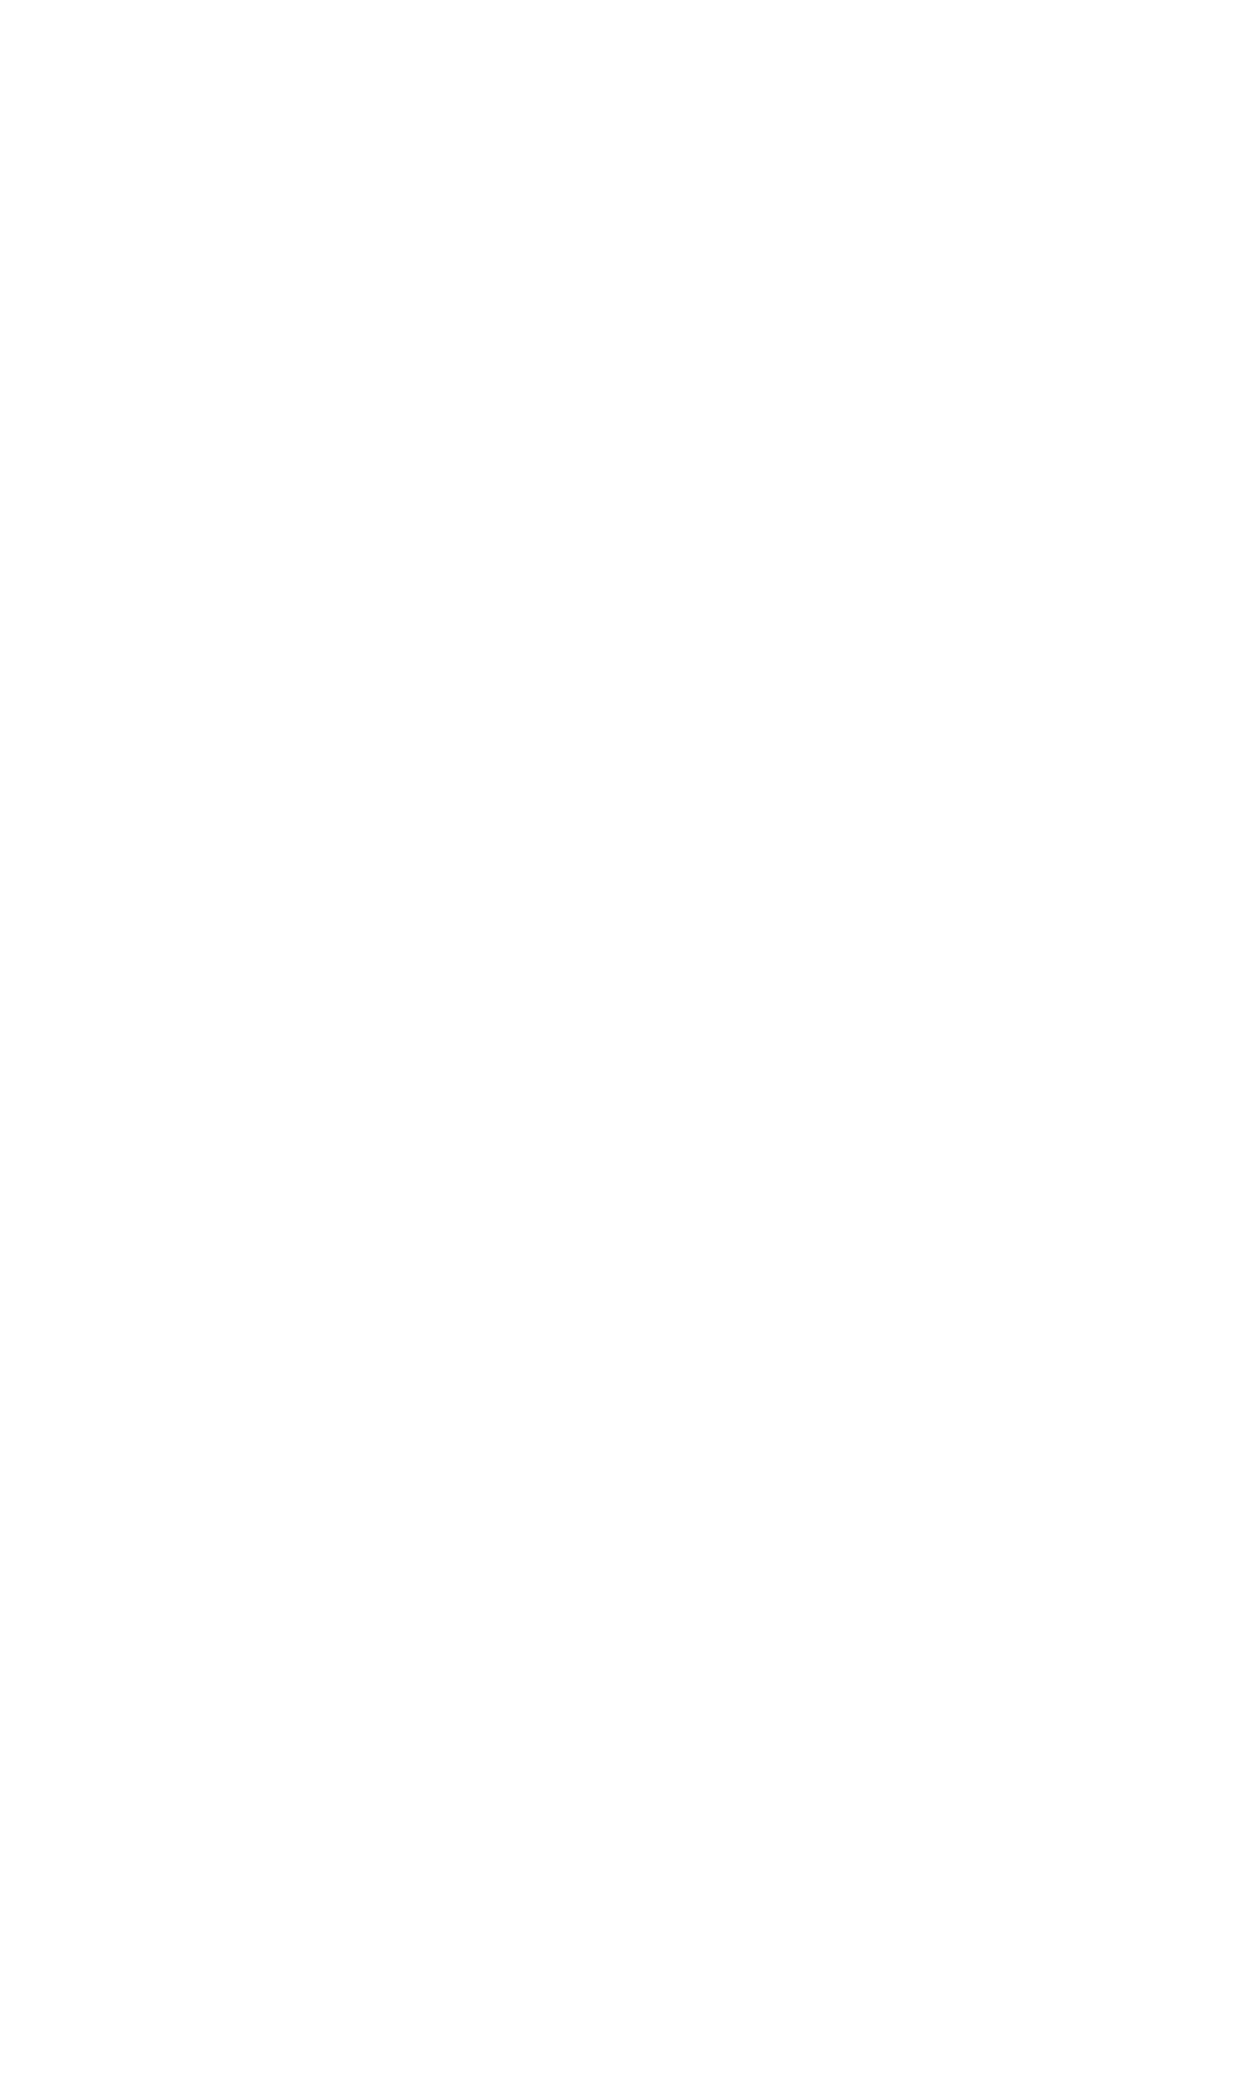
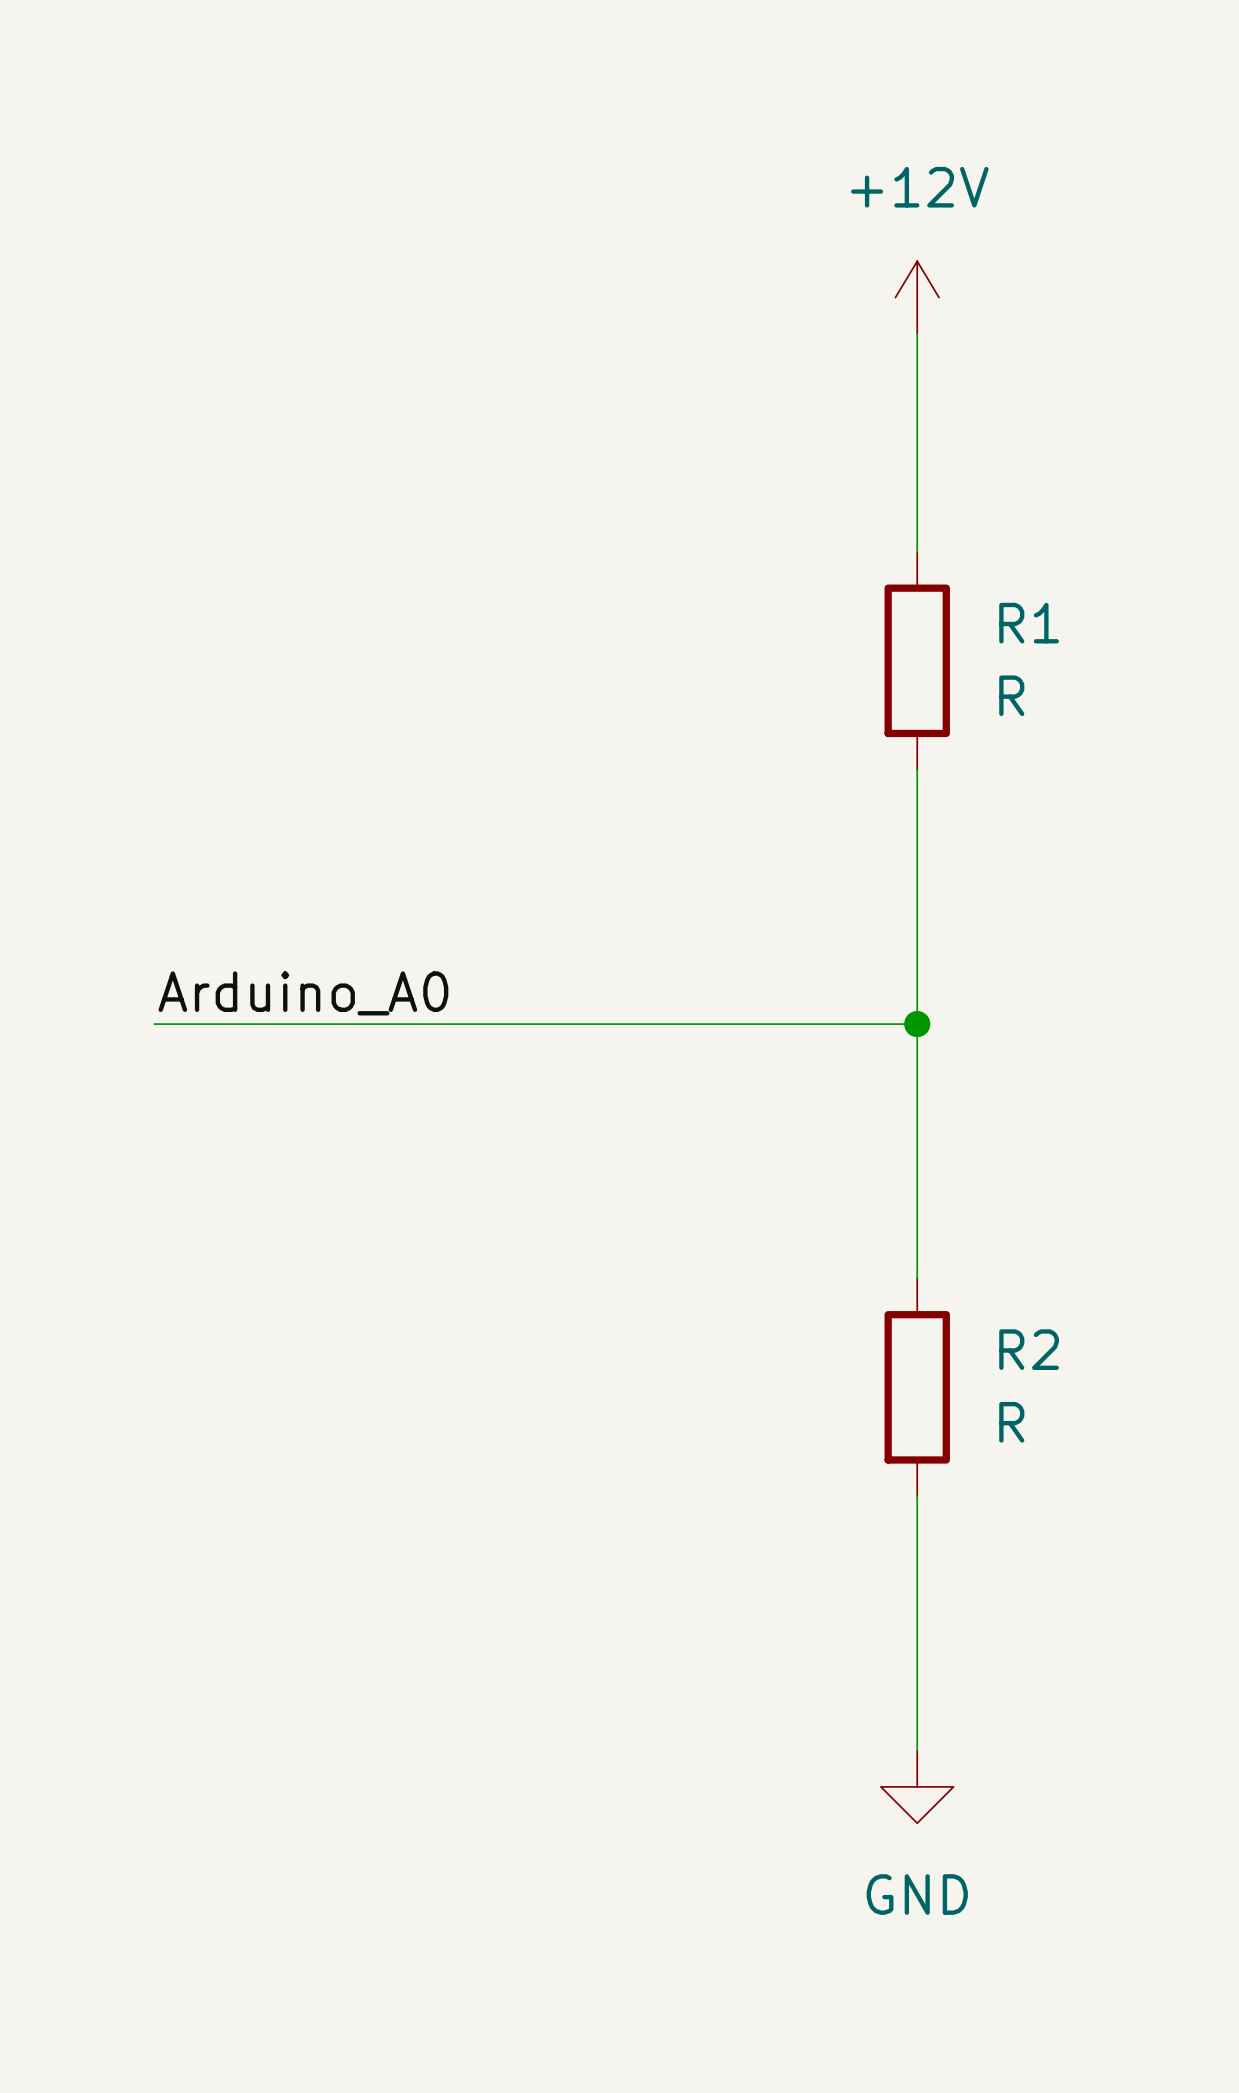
power symbol: none -> +12V (917, 297)
wire: none -> (917, 333) (917, 551)
R1: none -> R (917, 660)
wire: none -> (917, 769) (917, 1278)
label: none -> Arduino_A0 (303, 993)
wire: none -> (154, 1024) (917, 1024)
junction: none -> (917, 1024)
R2: none -> R (917, 1387)
wire: none -> (917, 1496) (917, 1750)
power symbol: none -> GND (917, 1786)

